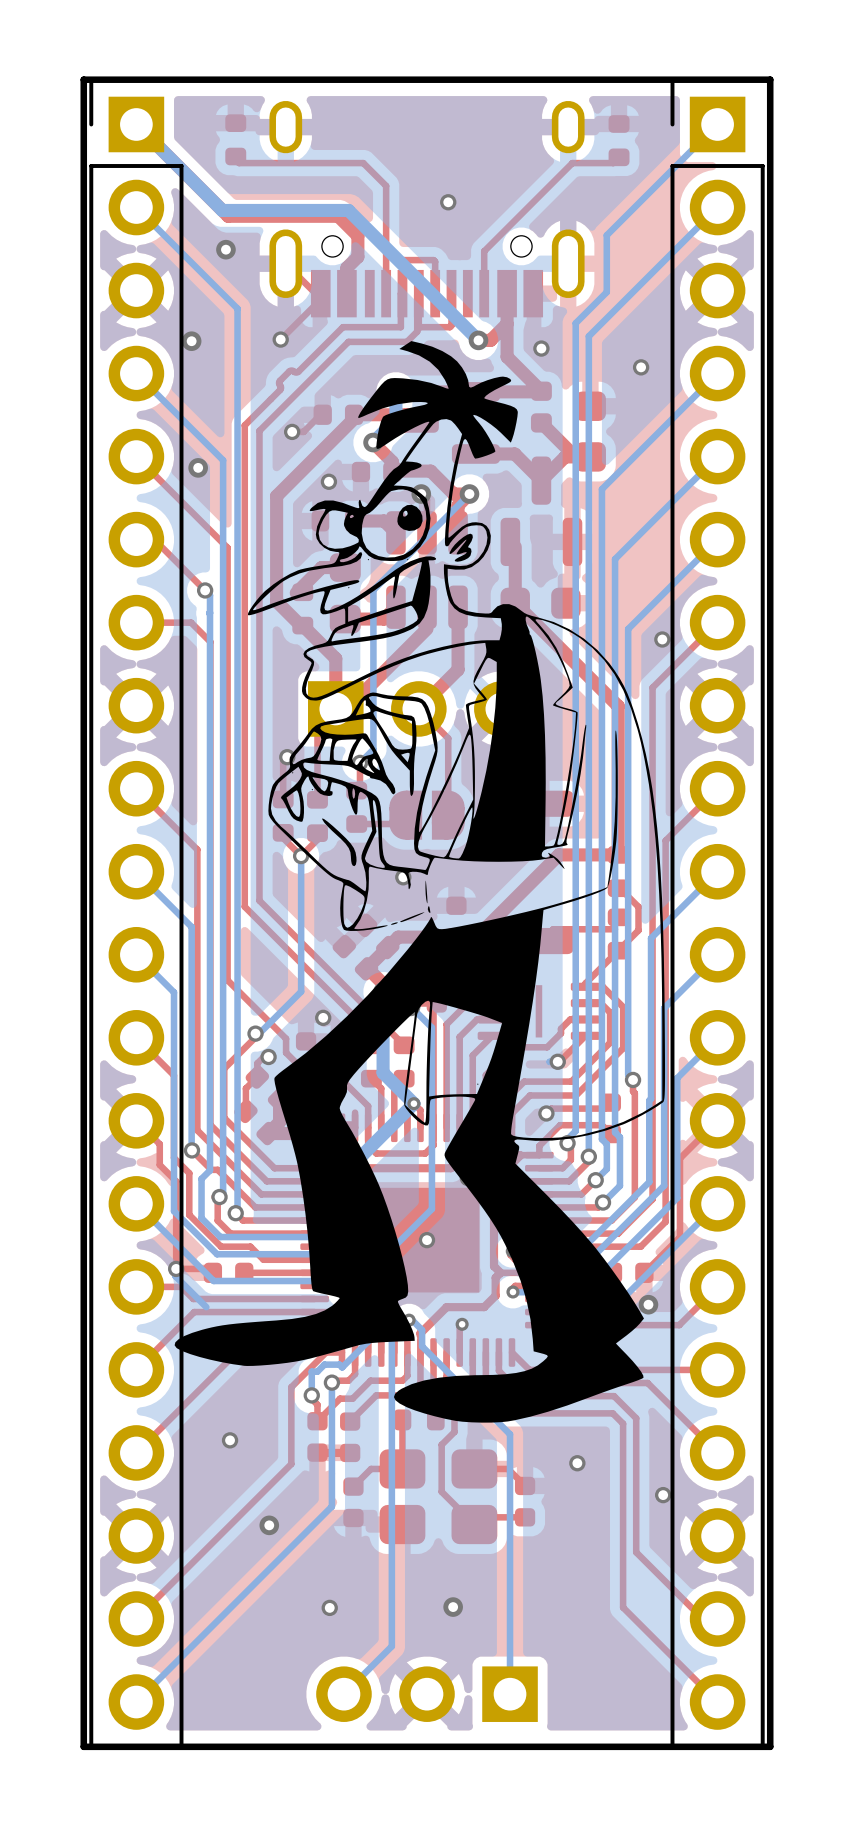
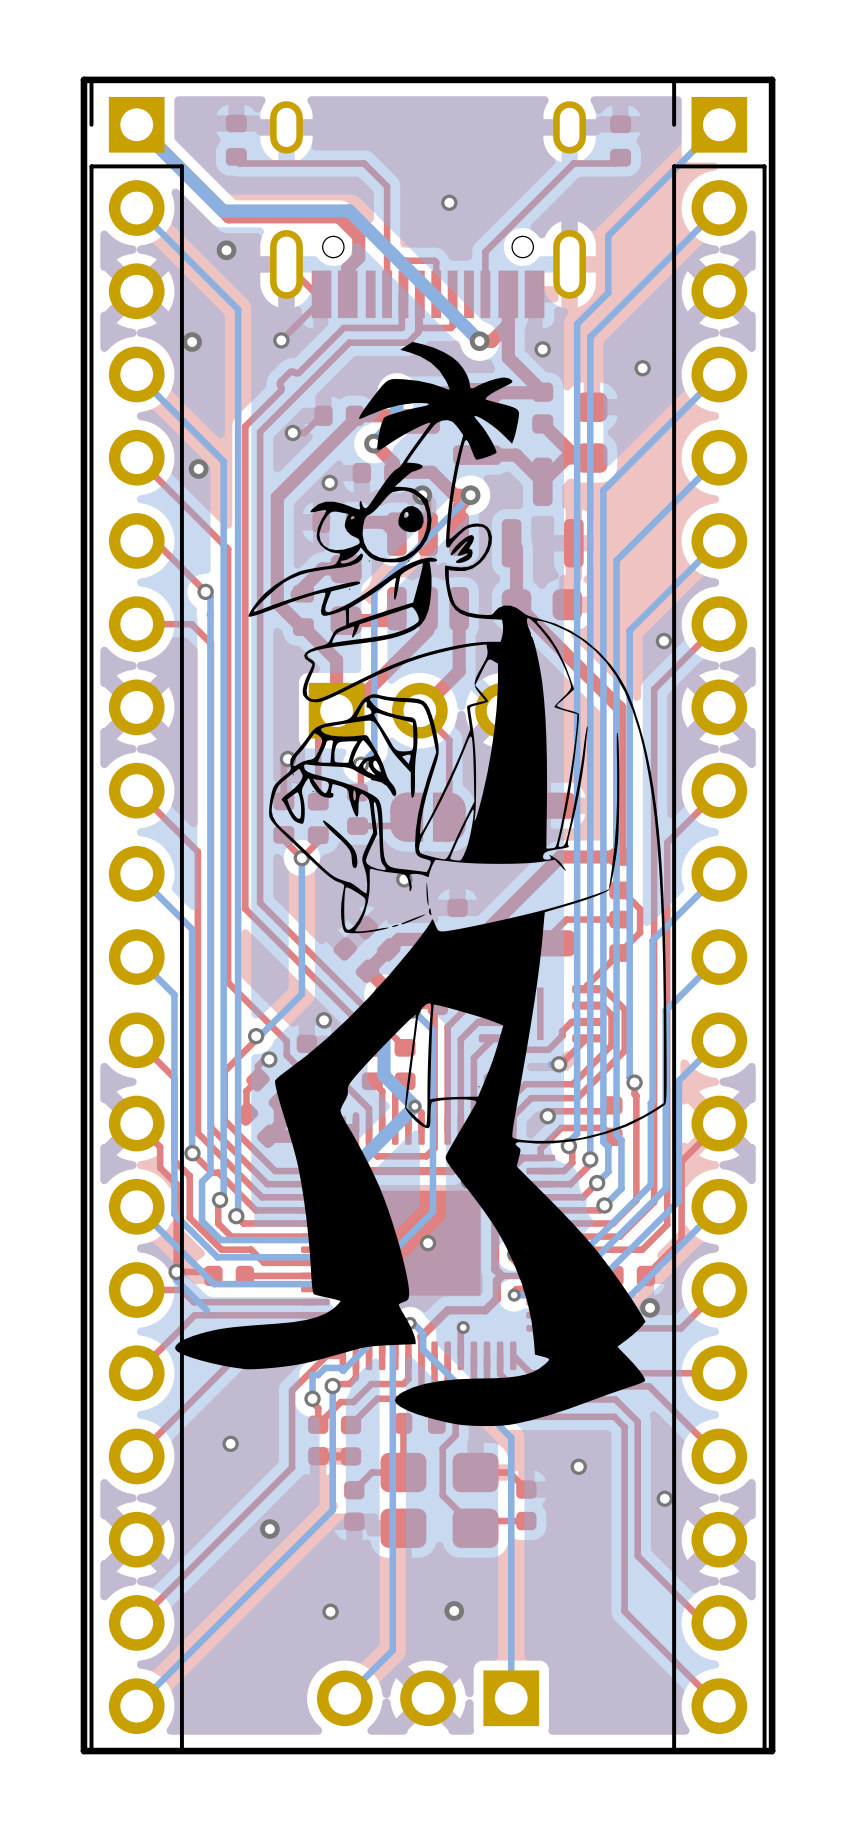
top track: (614, 929) (553, 929) -> (619, 919) (566, 919) (554, 931)

